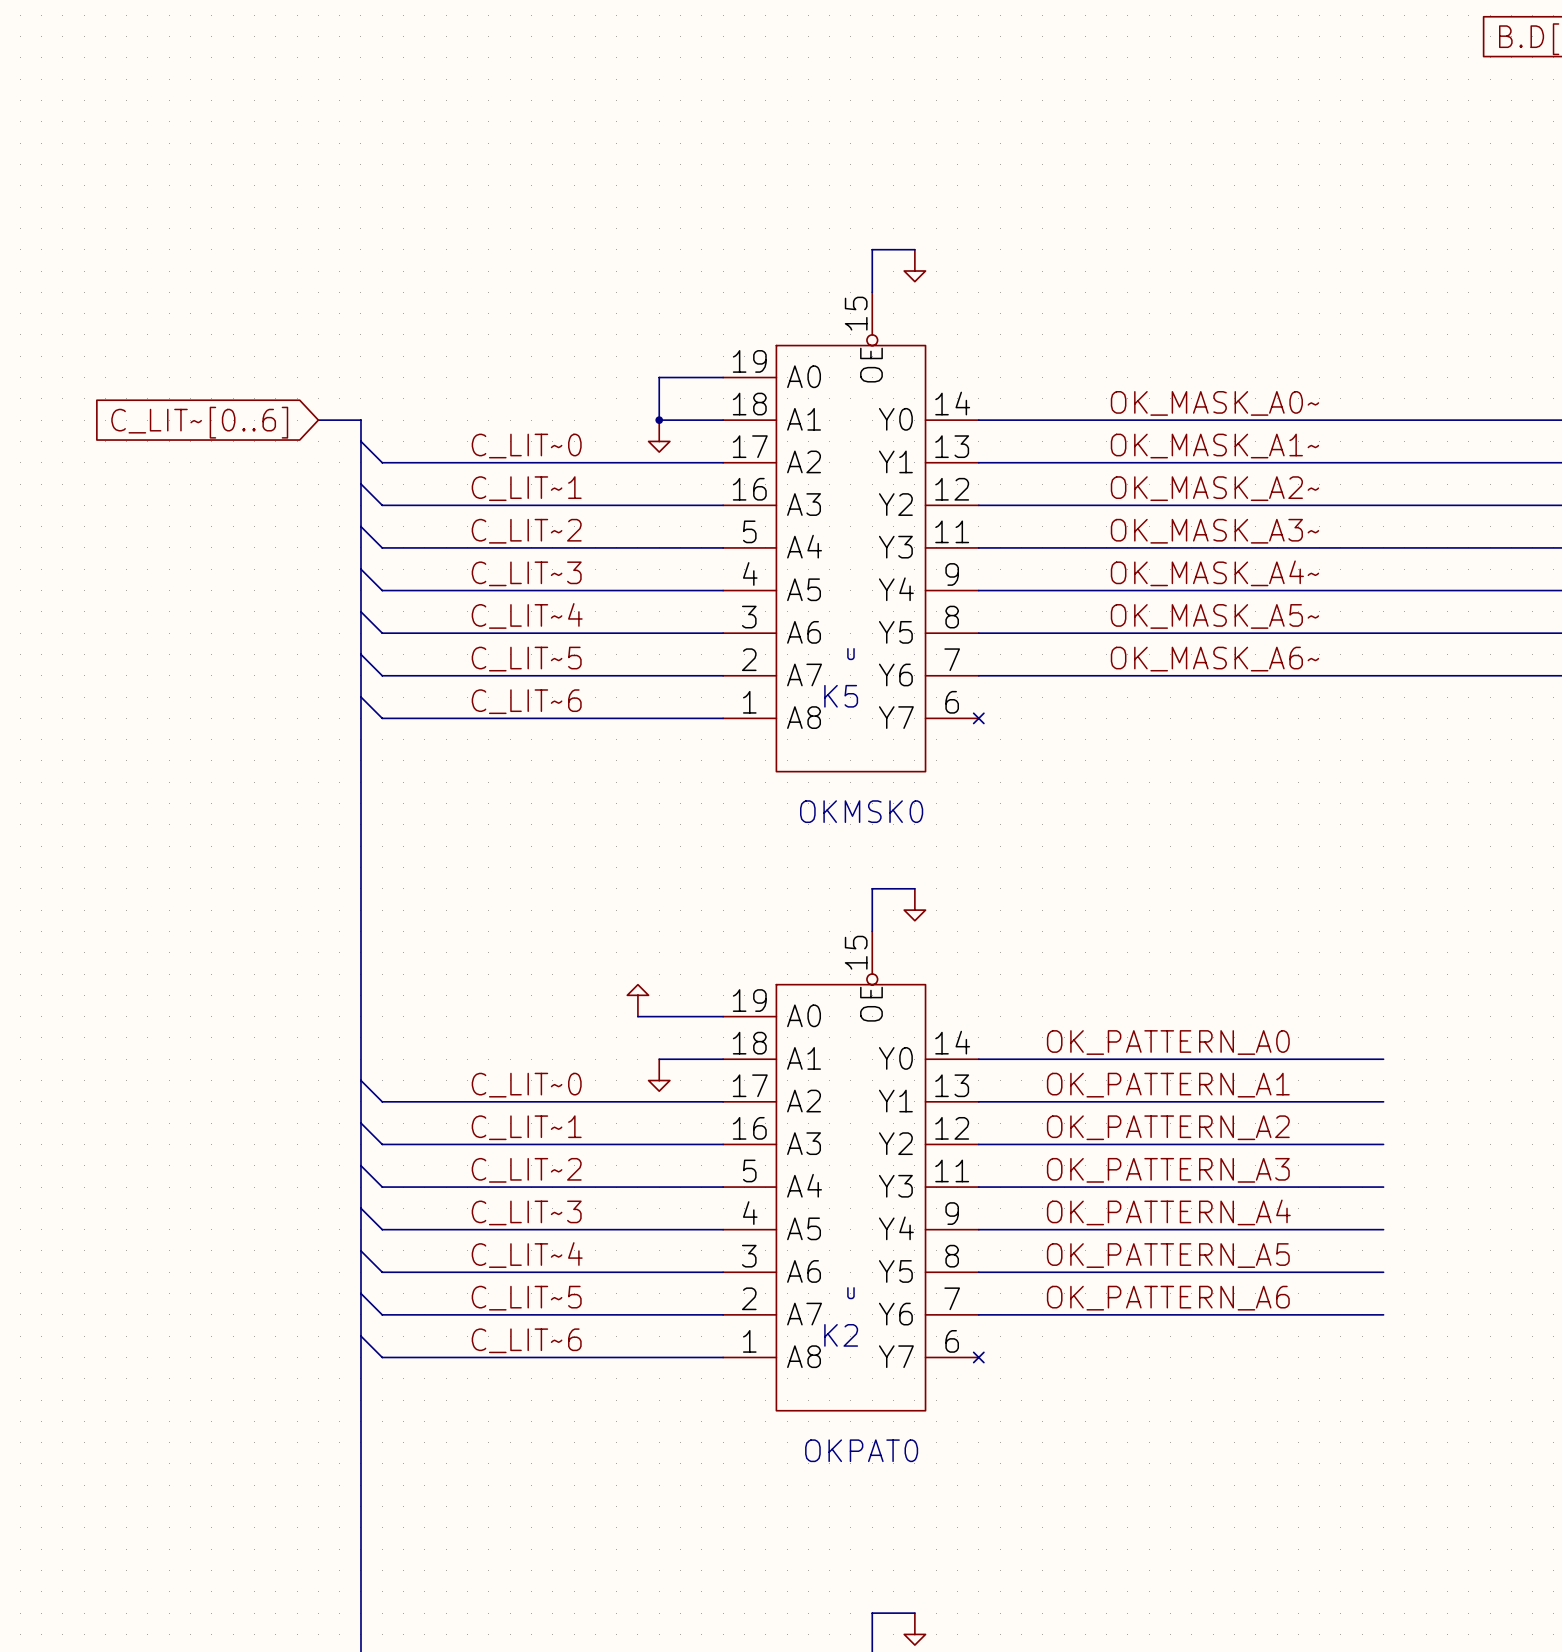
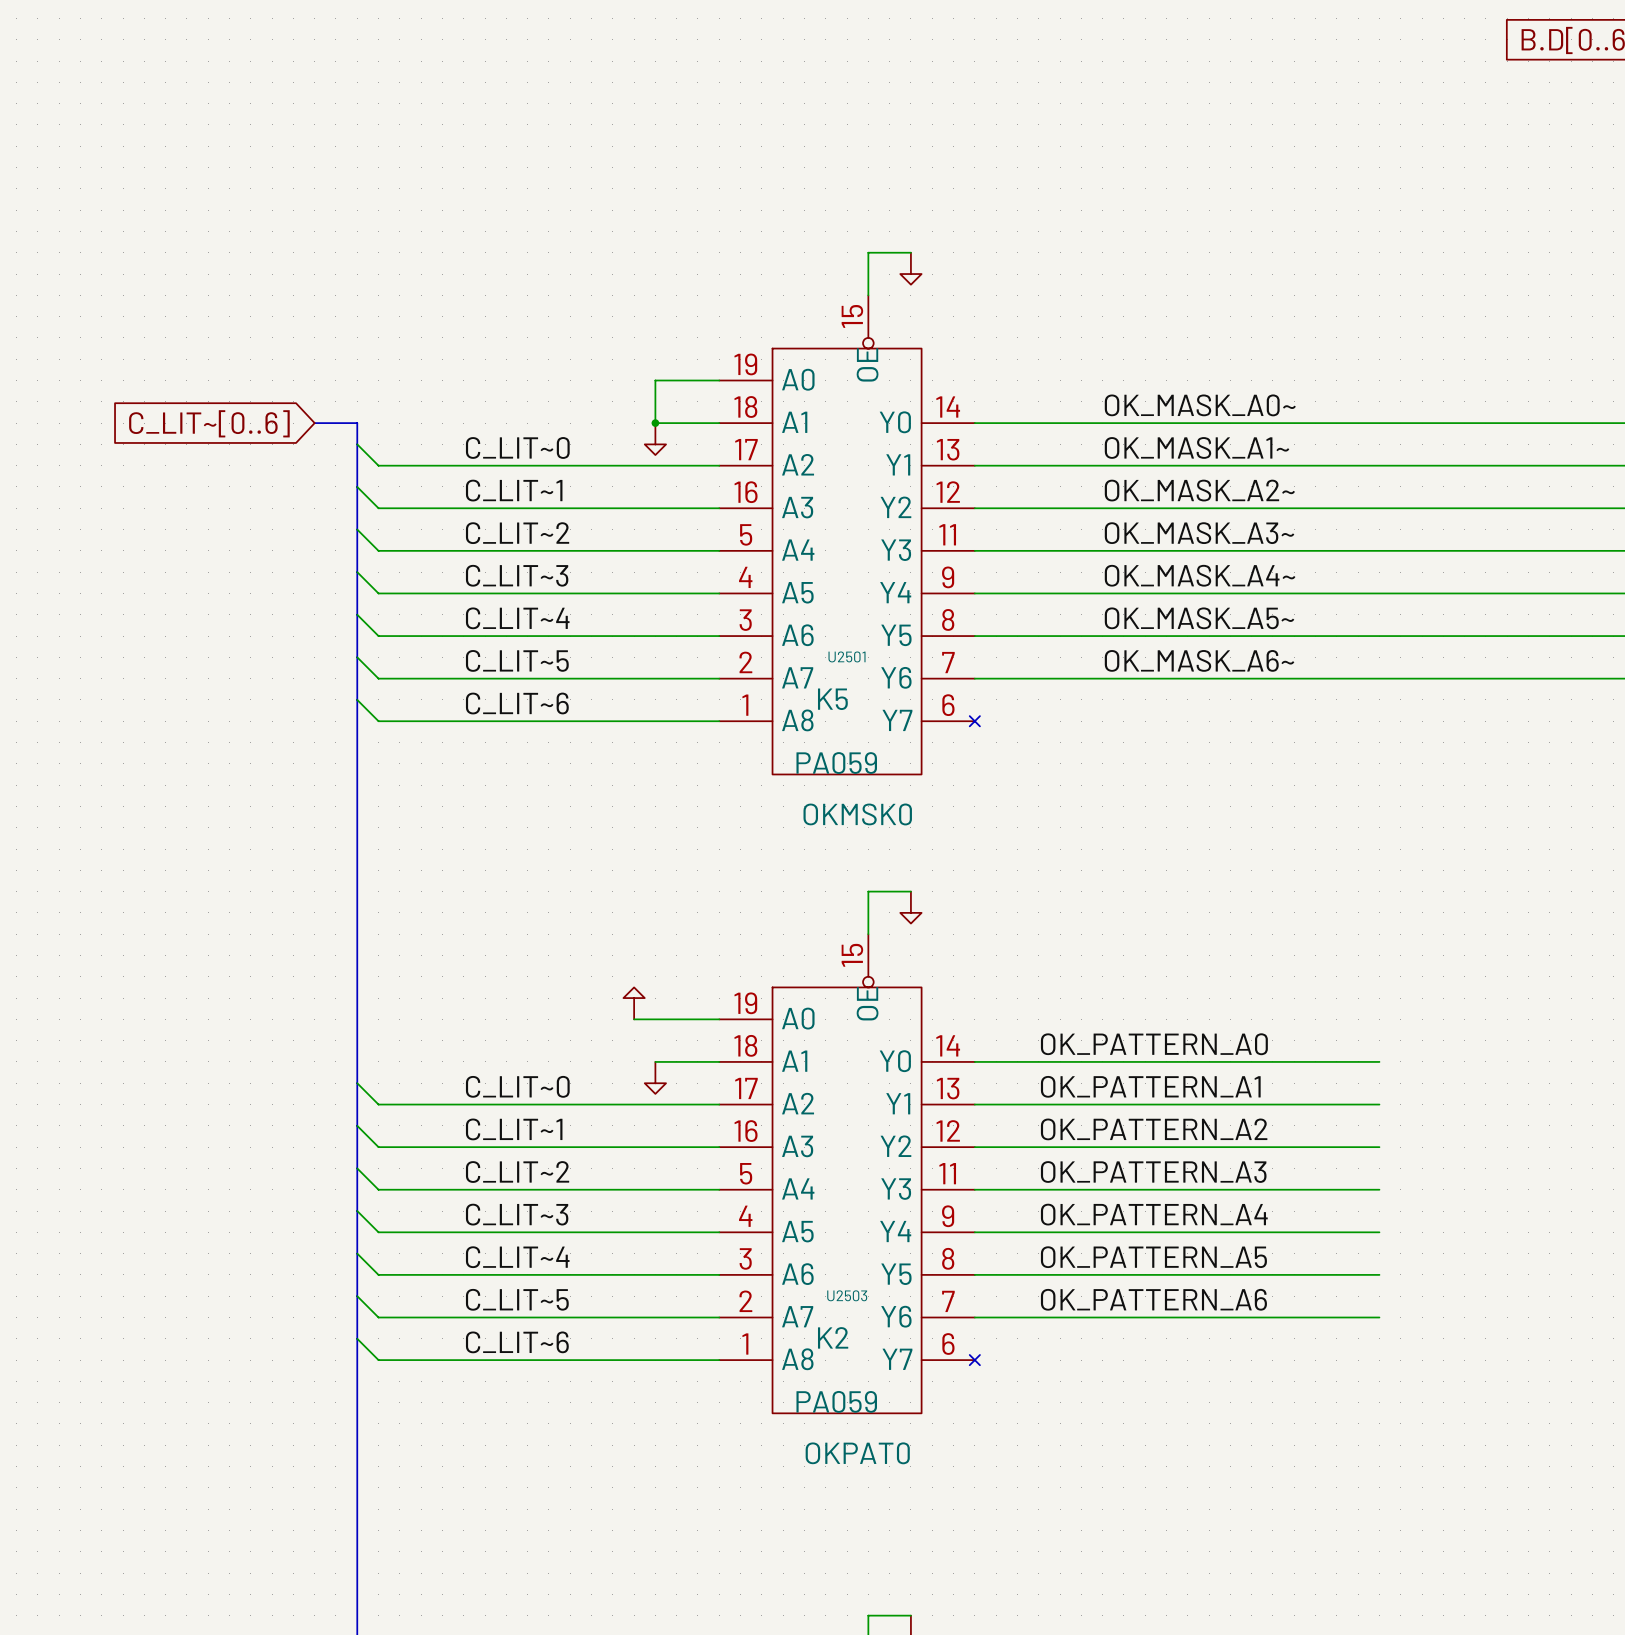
U name: U (850, 654) -> U2501 (847, 656)
U value: none -> PA059 (836, 763)
U name: U (850, 1293) -> U2503 (847, 1295)
U value: none -> PA059 (836, 1401)

